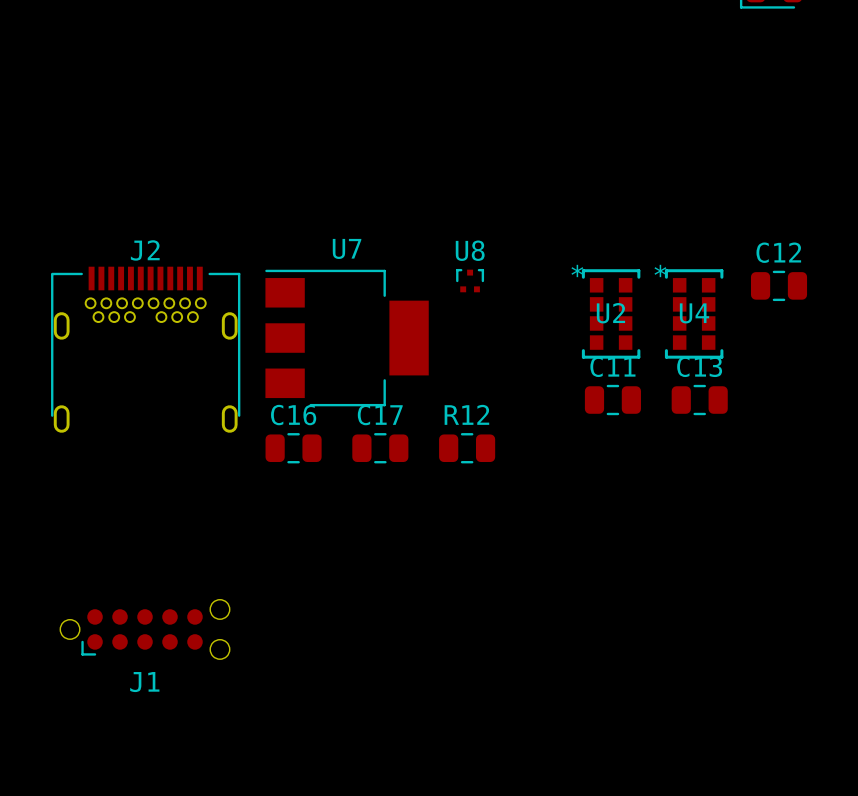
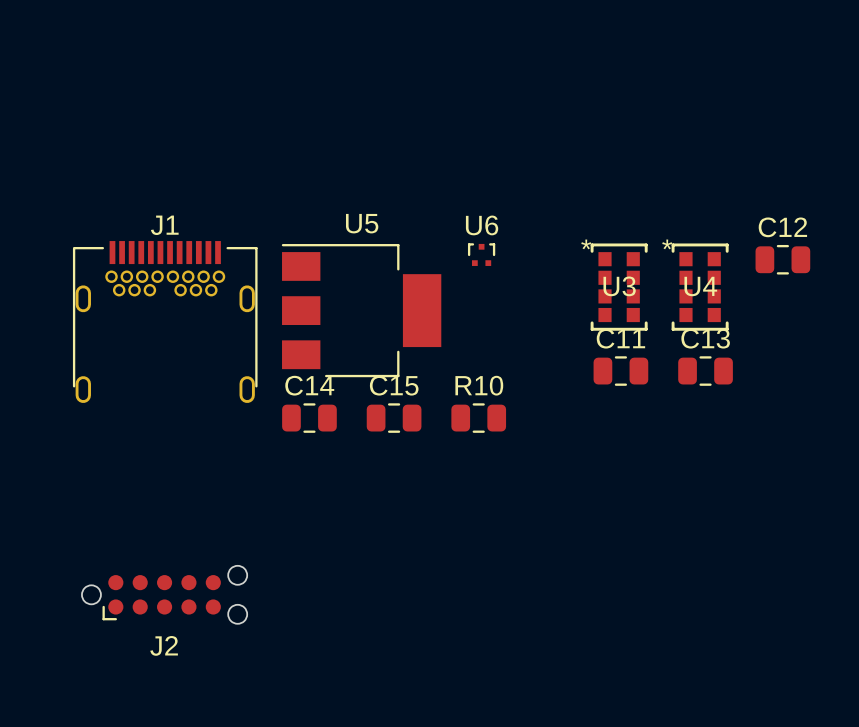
U7 name: U7 (347, 248) -> U5 (362, 223)
U8 name: U8 (470, 250) -> U6 (482, 225)
U2 name: U2 (610, 313) -> U3 (619, 286)
J2: (145, 349) -> none
J1: none -> (165, 322)
R12 name: R12 (466, 414) -> R10 (479, 385)
C16 name: C16 (293, 415) -> C14 (309, 385)
C17 name: C17 (380, 415) -> C15 (394, 385)
J1 name: J1 (144, 682) -> J2 (164, 645)

